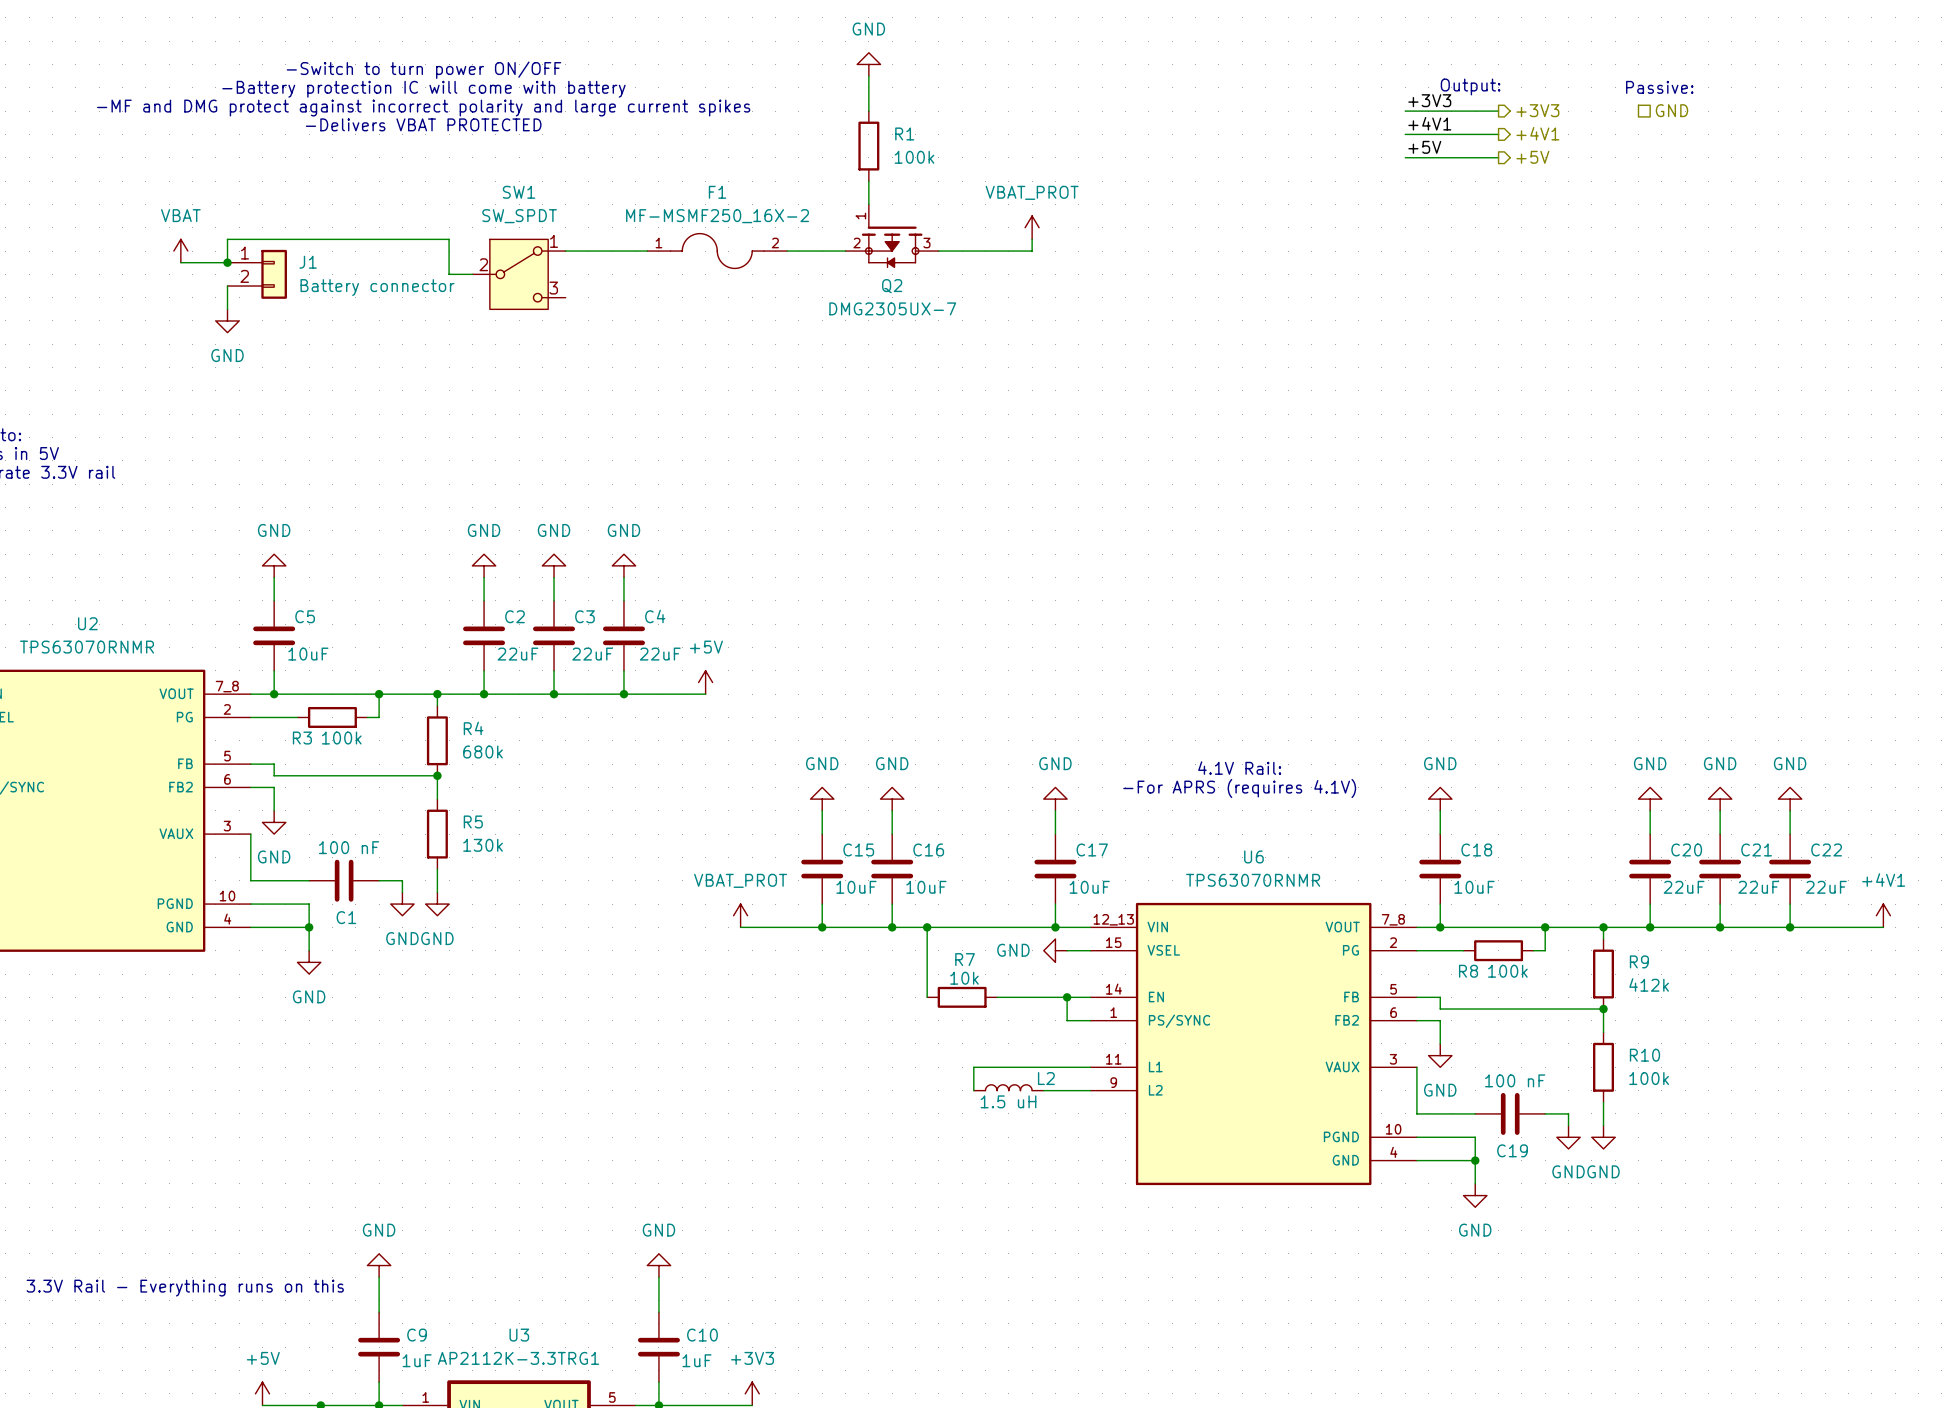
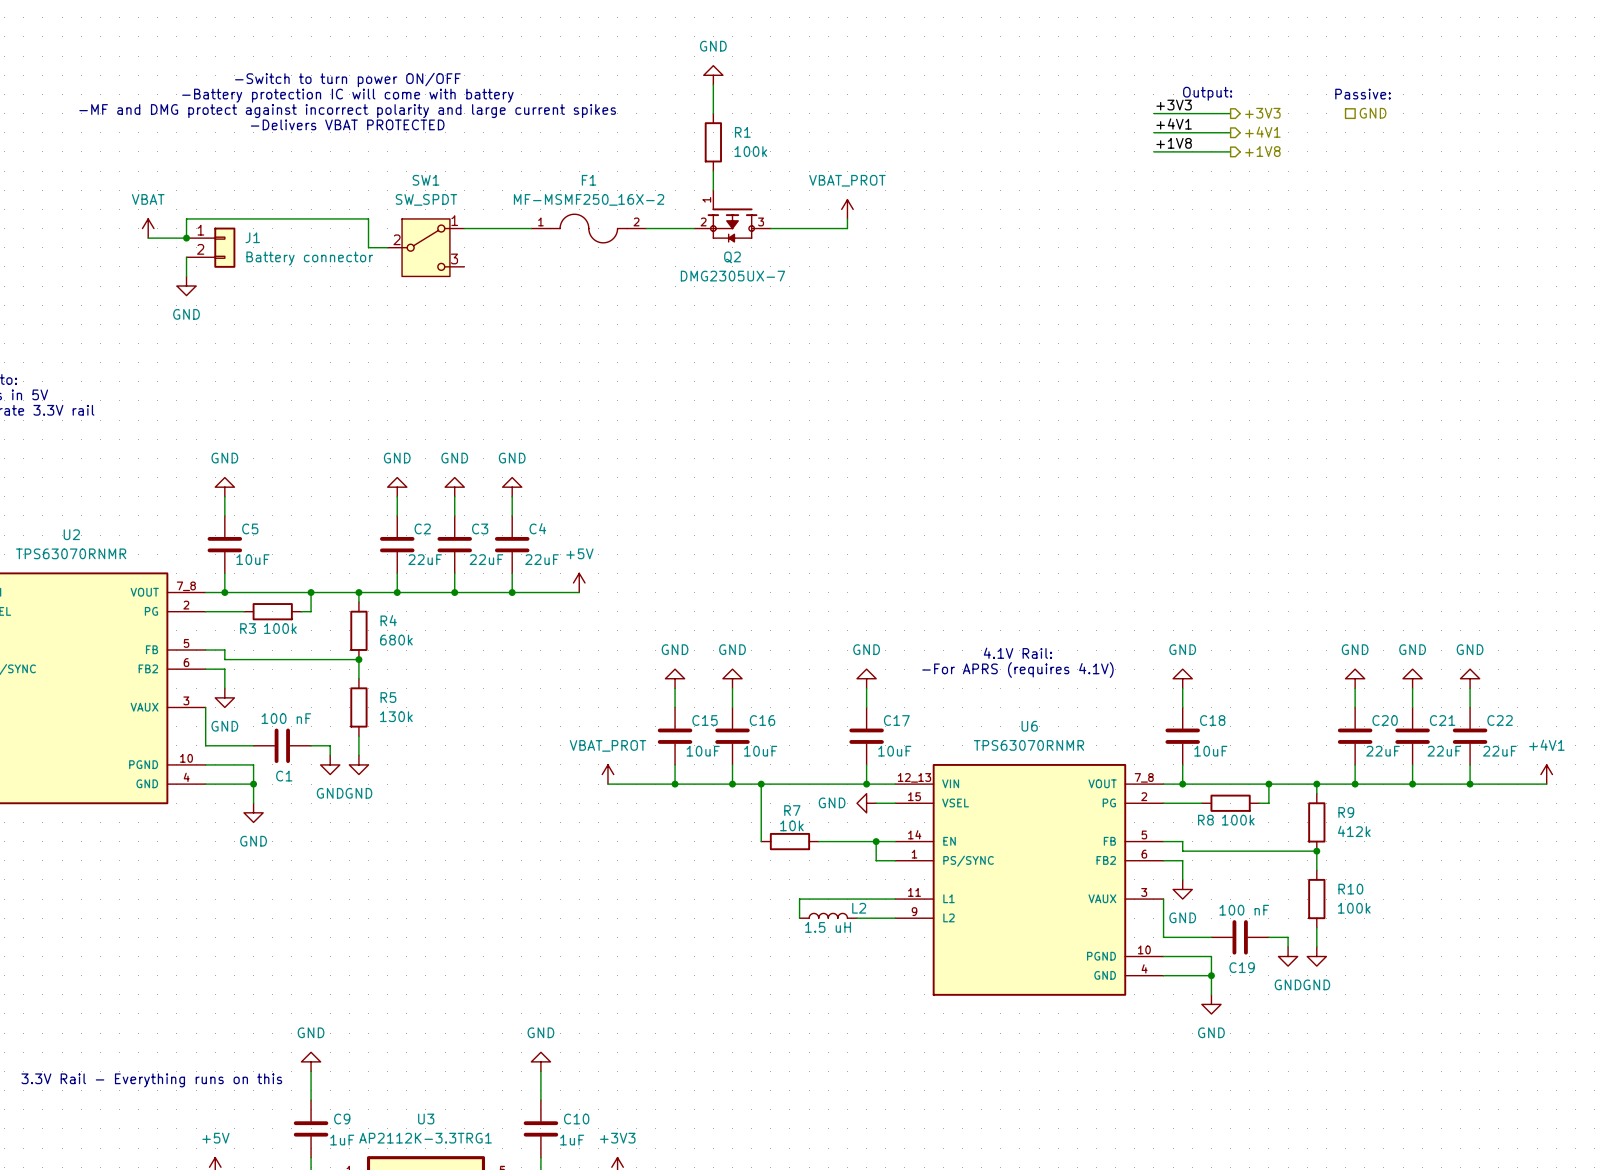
label: +5V (1424, 147) -> +1V8 (1174, 143)
hierarchical label: +5V (1532, 157) -> +1V8 (1262, 151)

